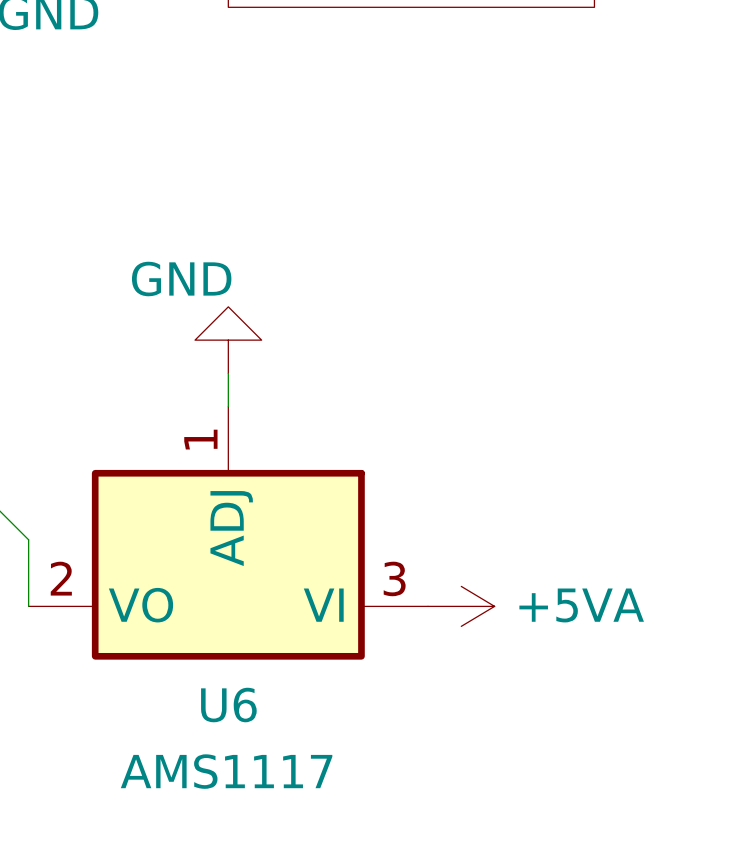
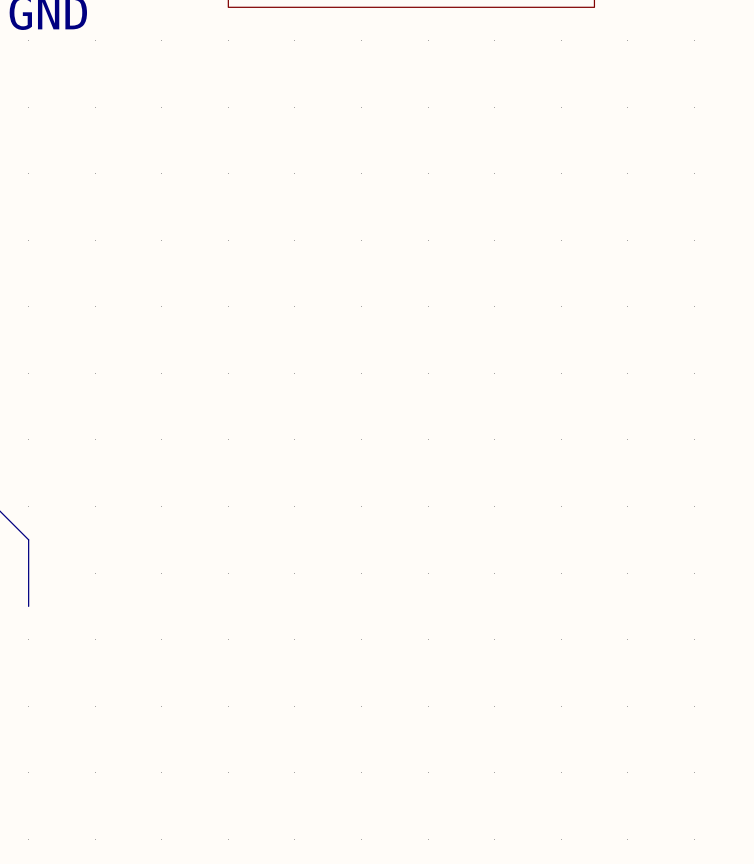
power symbol: GND (228, 340) -> none
wire: (228, 373) (228, 406) -> none
U6: AMS1117 (228, 533) -> none
power symbol: +5VA (461, 606) -> none

